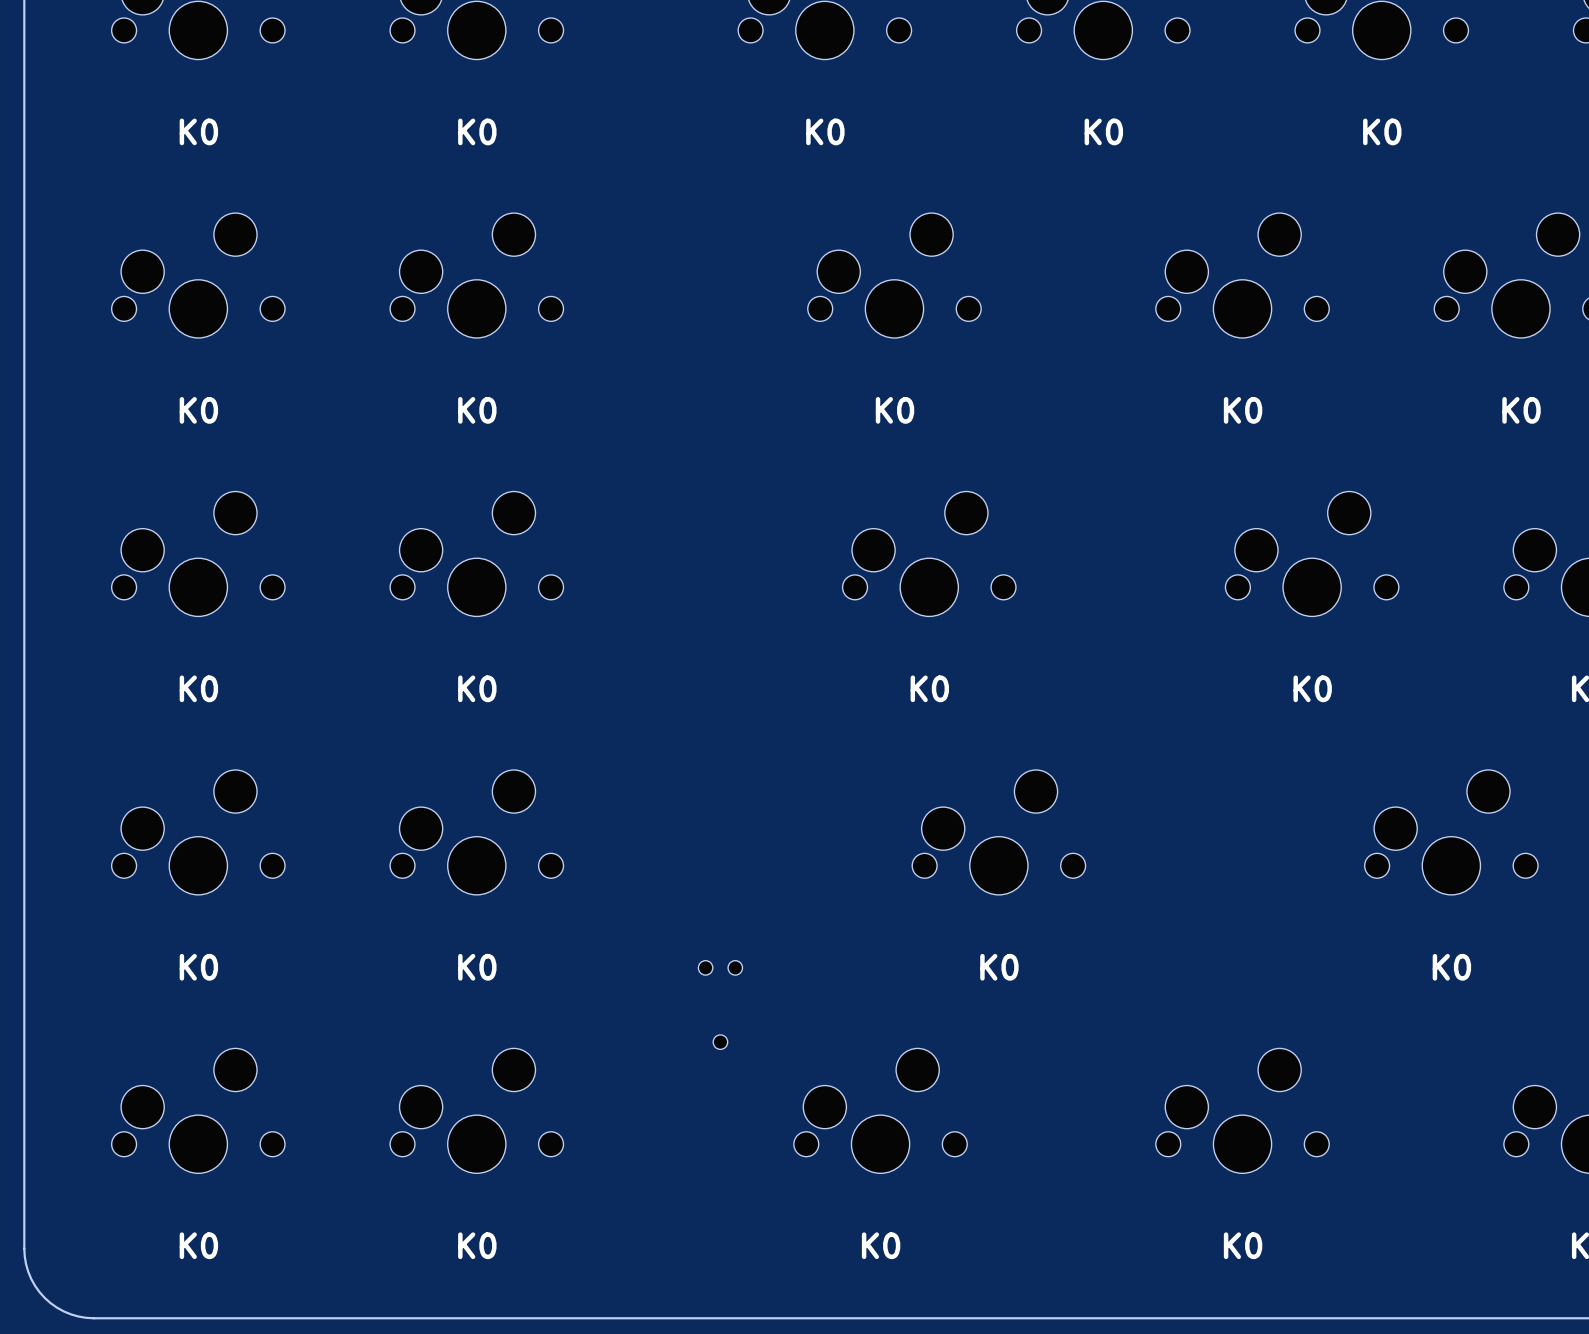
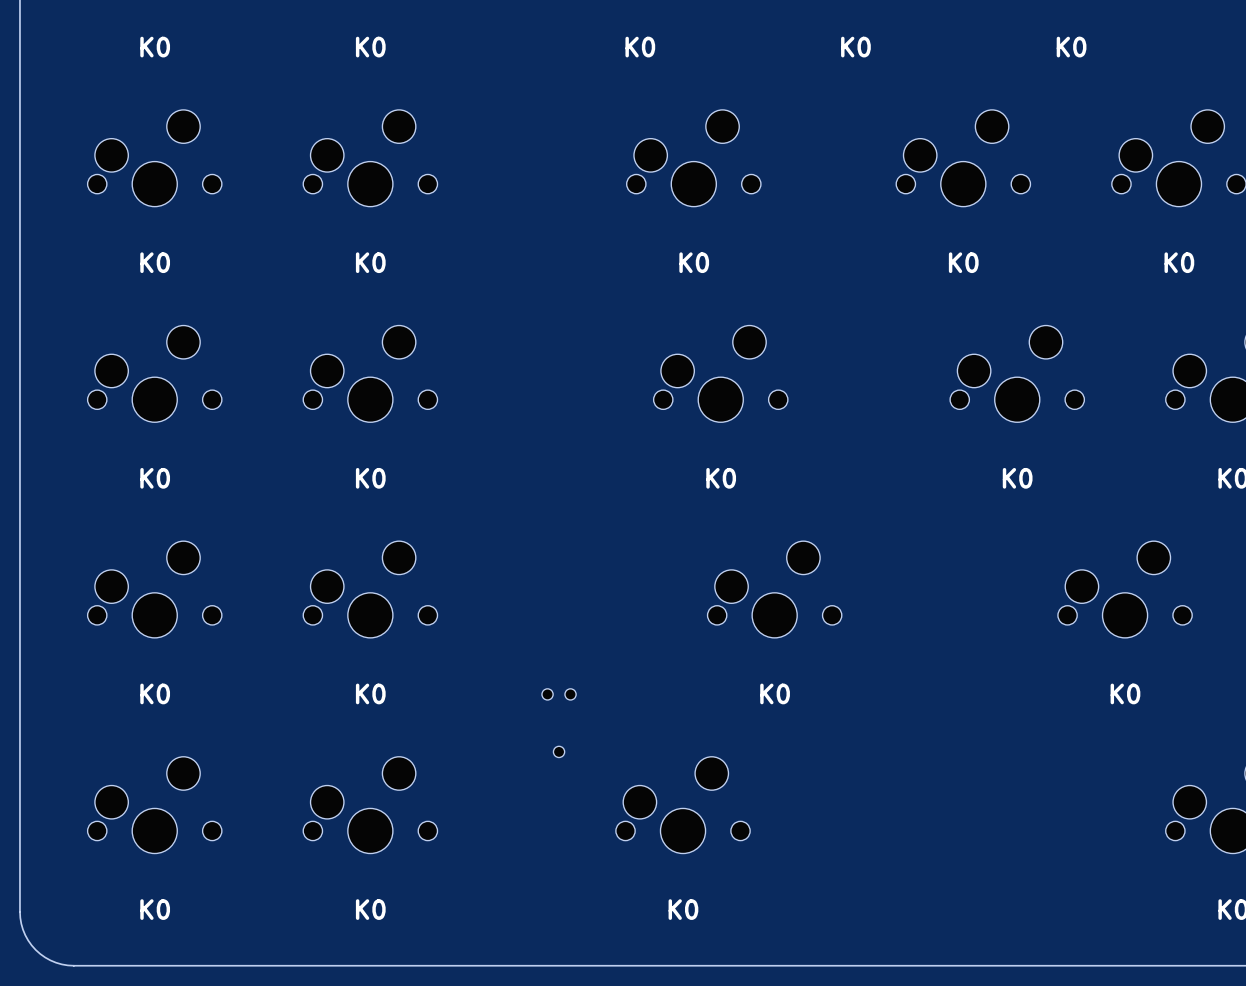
part: K0 (1242, 1110) -> none

